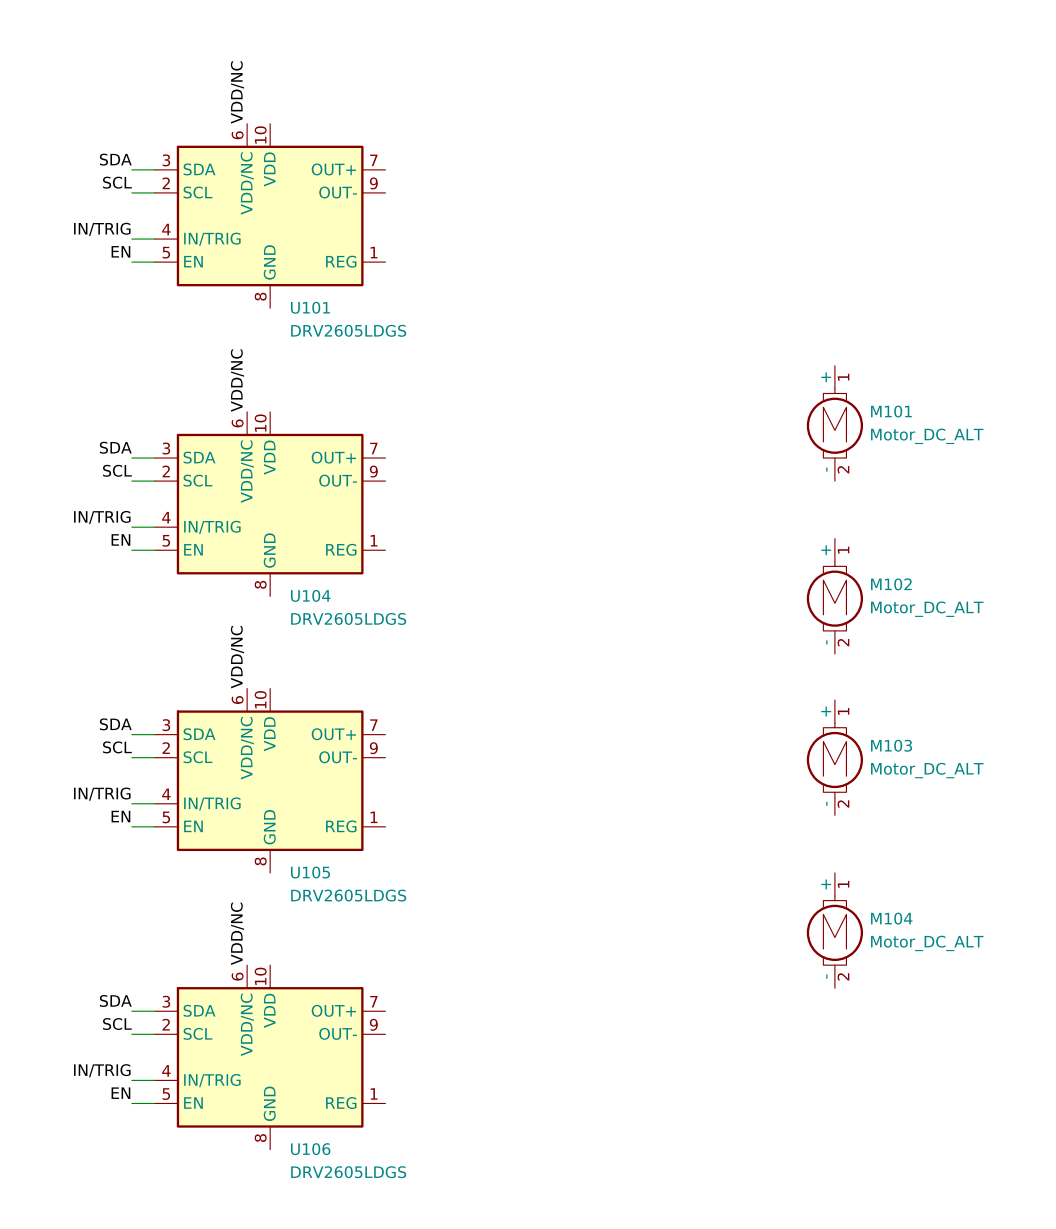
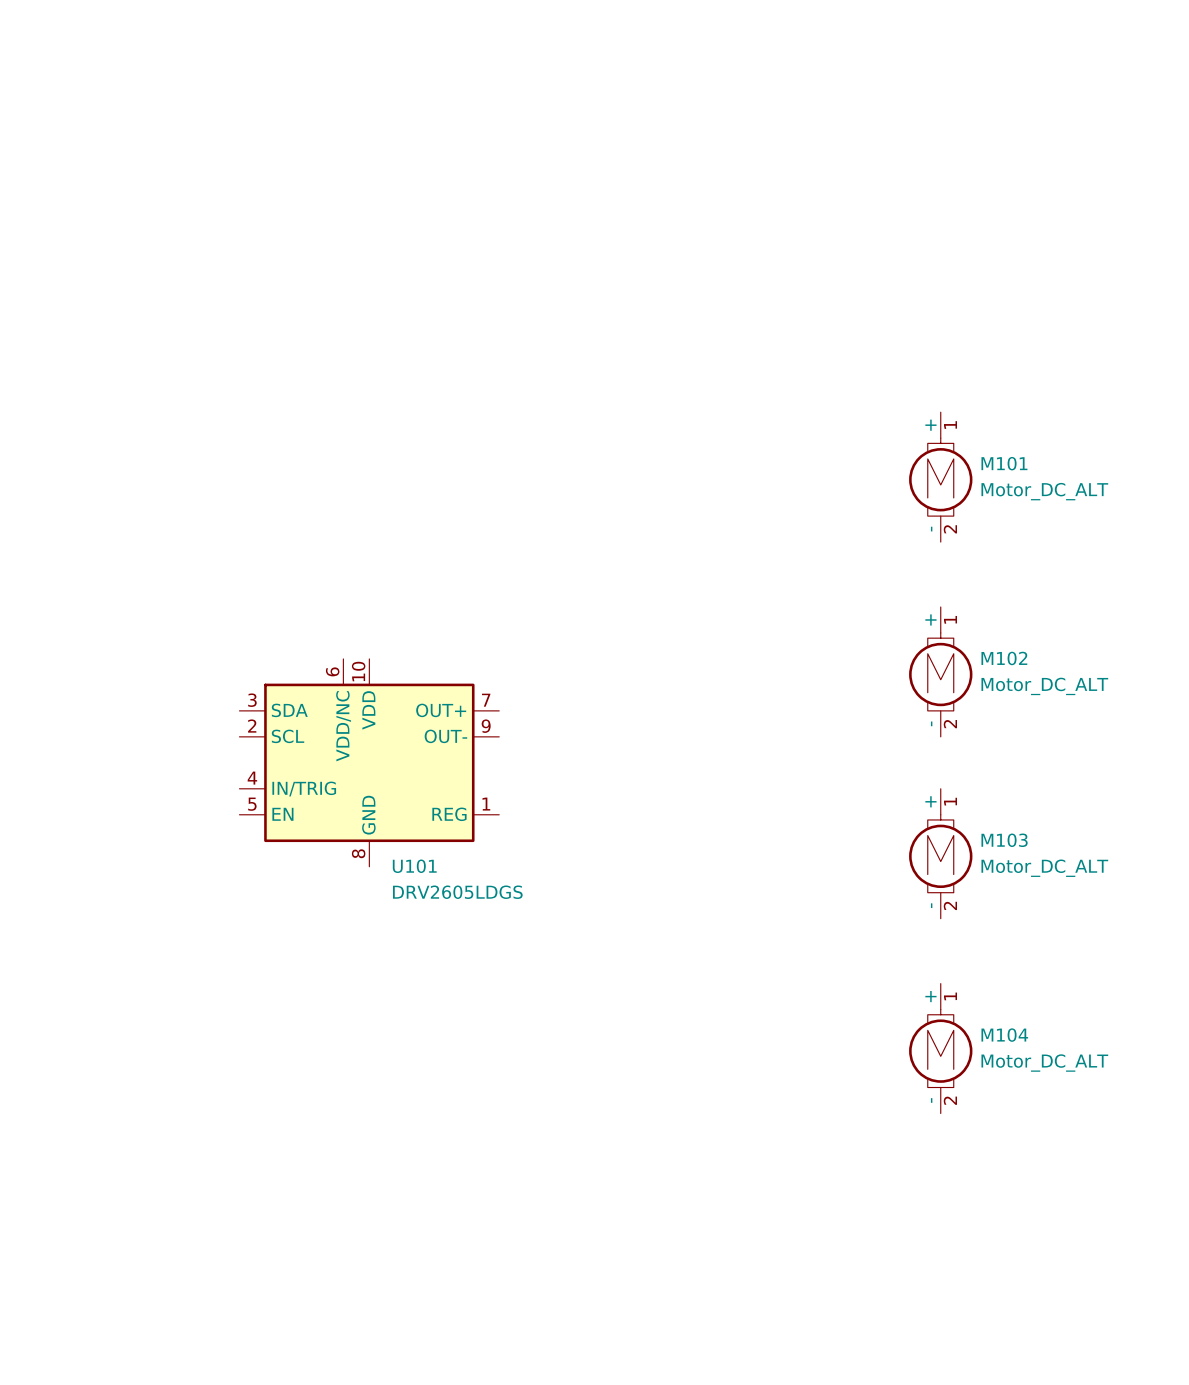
label: VDD/NC (237, 92) -> none
label: SDA (115, 159) -> none
wire: (131, 169) (154, 169) -> none
label: SCL (117, 182) -> none
wire: (131, 192) (154, 192) -> none
U101 position: (270, 215) -> (369, 762)
label: IN/TRIG (102, 229) -> none
wire: (131, 239) (154, 239) -> none
label: EN (120, 251) -> none
wire: (131, 262) (154, 262) -> none
label: VDD/NC (237, 380) -> none
label: SDA (115, 447) -> none
wire: (131, 458) (154, 458) -> none
label: SCL (117, 470) -> none
wire: (131, 481) (154, 481) -> none
U104: DRV2605LDGS (270, 504) -> none
label: IN/TRIG (102, 517) -> none
wire: (131, 527) (154, 527) -> none
label: EN (120, 539) -> none
wire: (131, 550) (154, 550) -> none
label: VDD/NC (237, 657) -> none
label: SDA (115, 724) -> none
wire: (131, 734) (154, 734) -> none
label: SCL (117, 747) -> none
wire: (131, 757) (154, 757) -> none
U105: DRV2605LDGS (270, 780) -> none
label: IN/TRIG (102, 794) -> none
wire: (131, 803) (154, 803) -> none
label: EN (120, 816) -> none
wire: (131, 826) (154, 826) -> none
label: VDD/NC (237, 933) -> none
label: SDA (115, 1000) -> none
wire: (131, 1011) (154, 1011) -> none
label: SCL (117, 1024) -> none
wire: (131, 1034) (154, 1034) -> none
U106: DRV2605LDGS (270, 1057) -> none
label: IN/TRIG (102, 1070) -> none
wire: (131, 1080) (154, 1080) -> none
label: EN (120, 1093) -> none
wire: (131, 1103) (154, 1103) -> none

